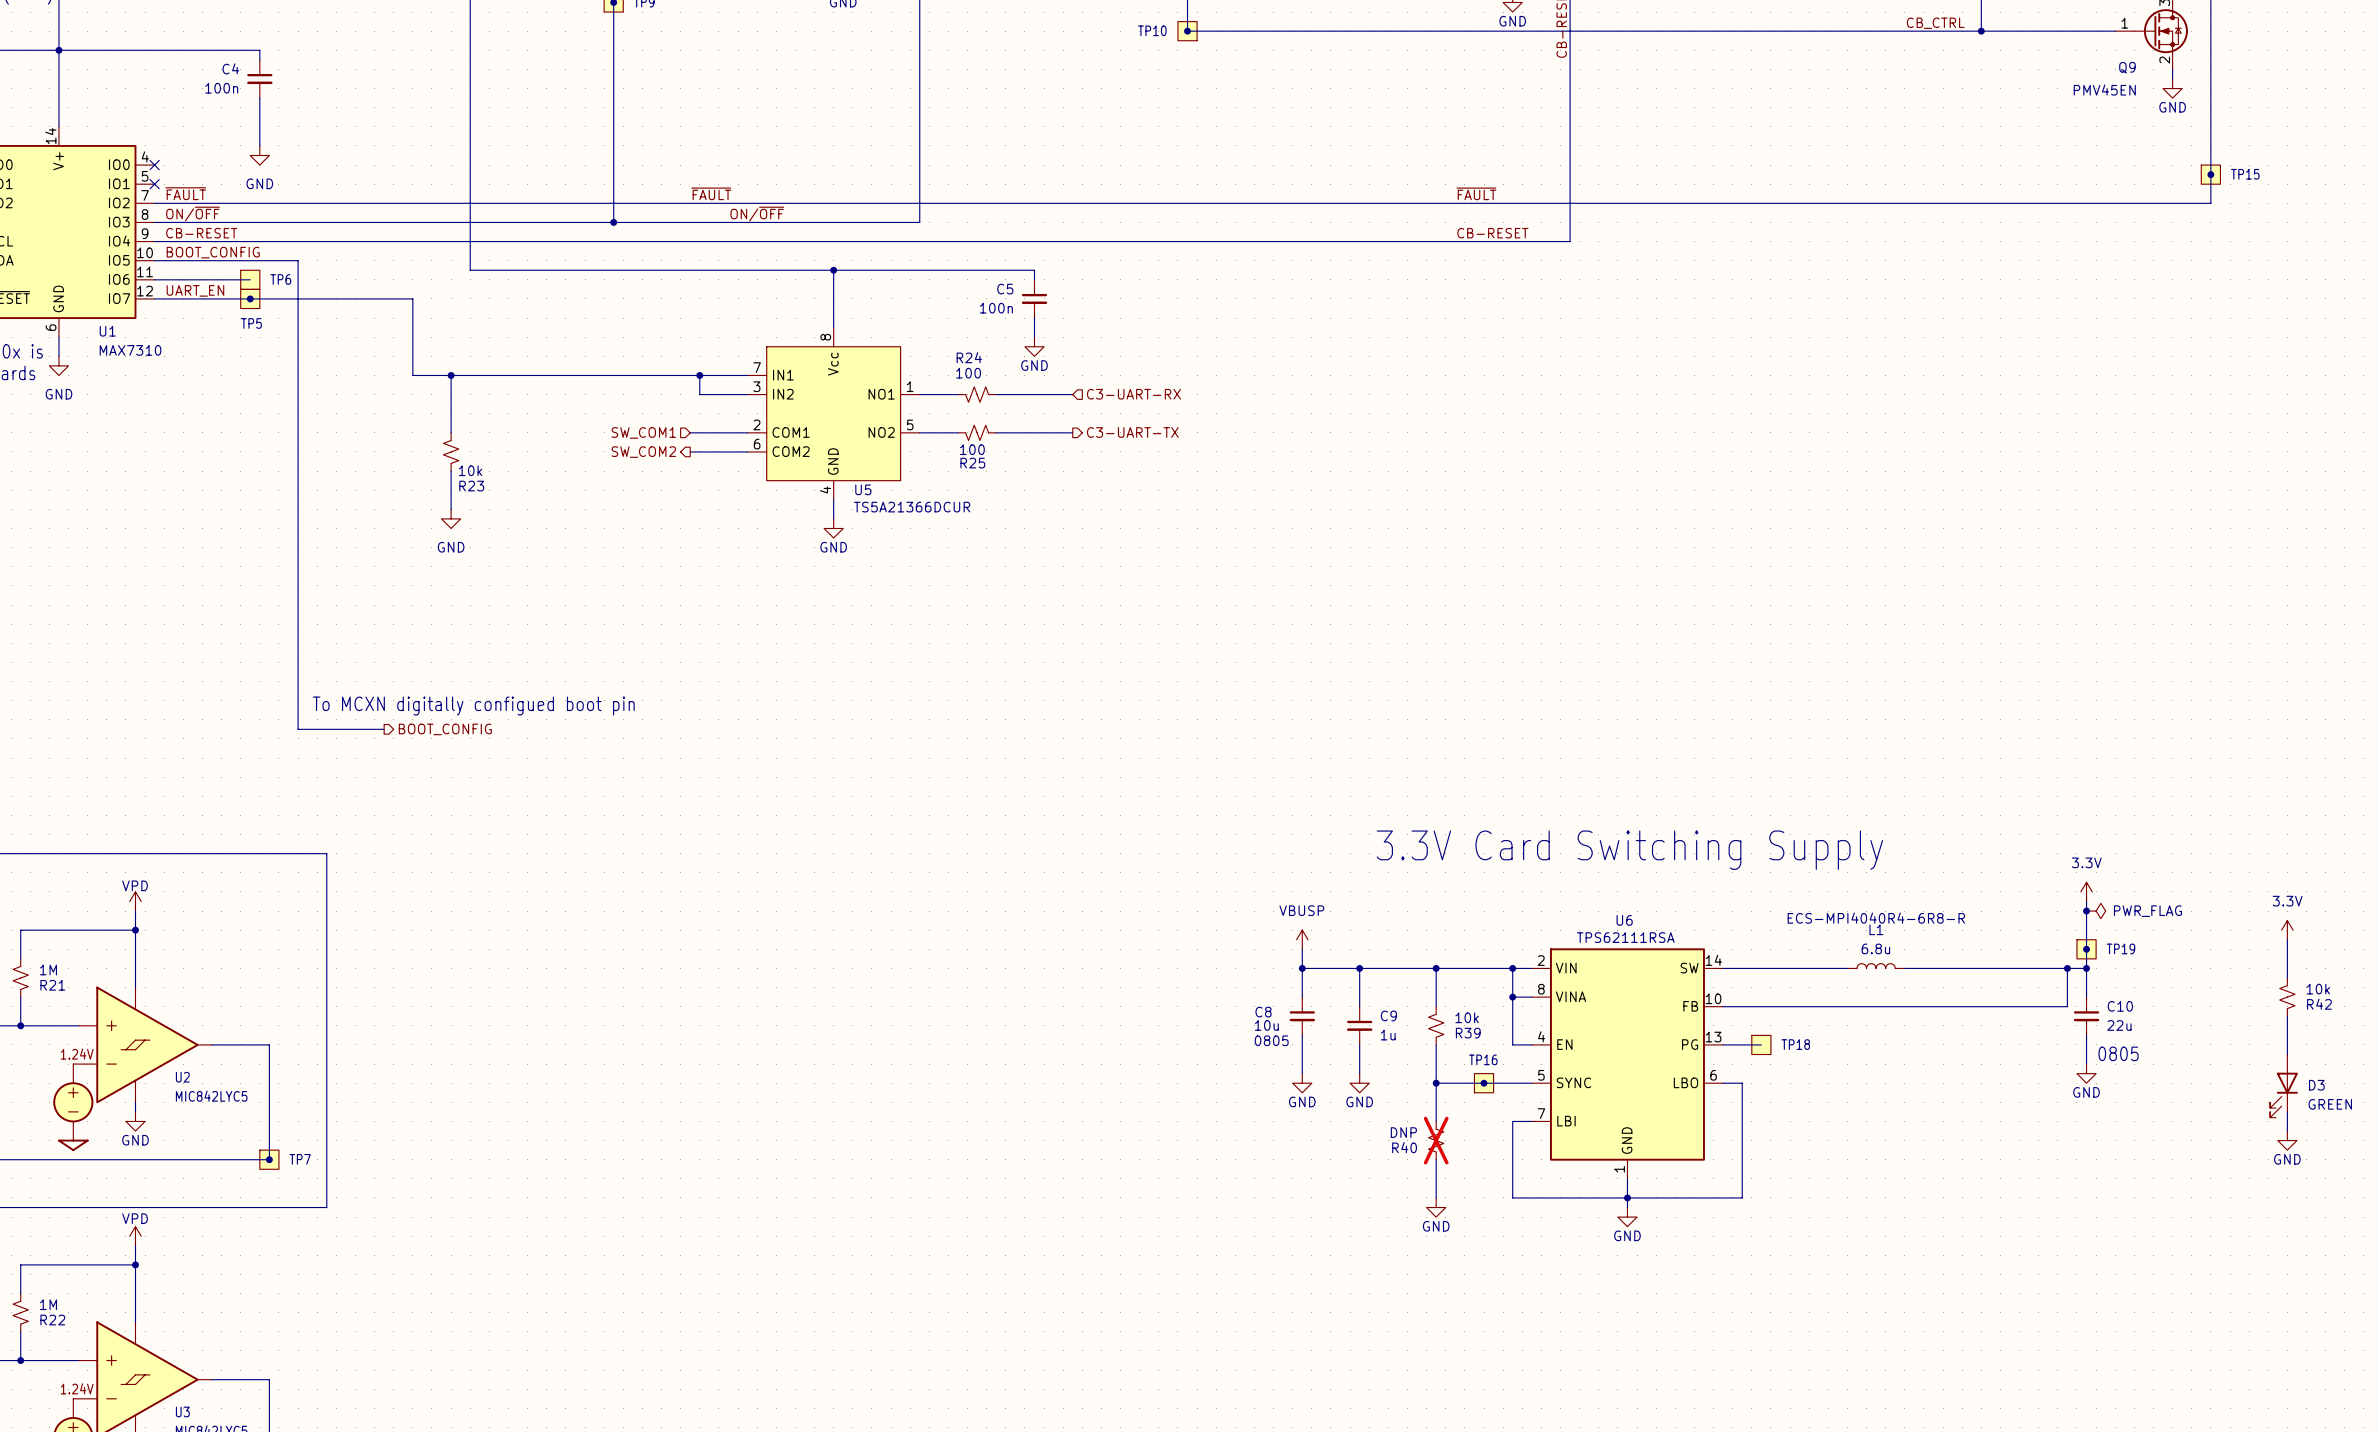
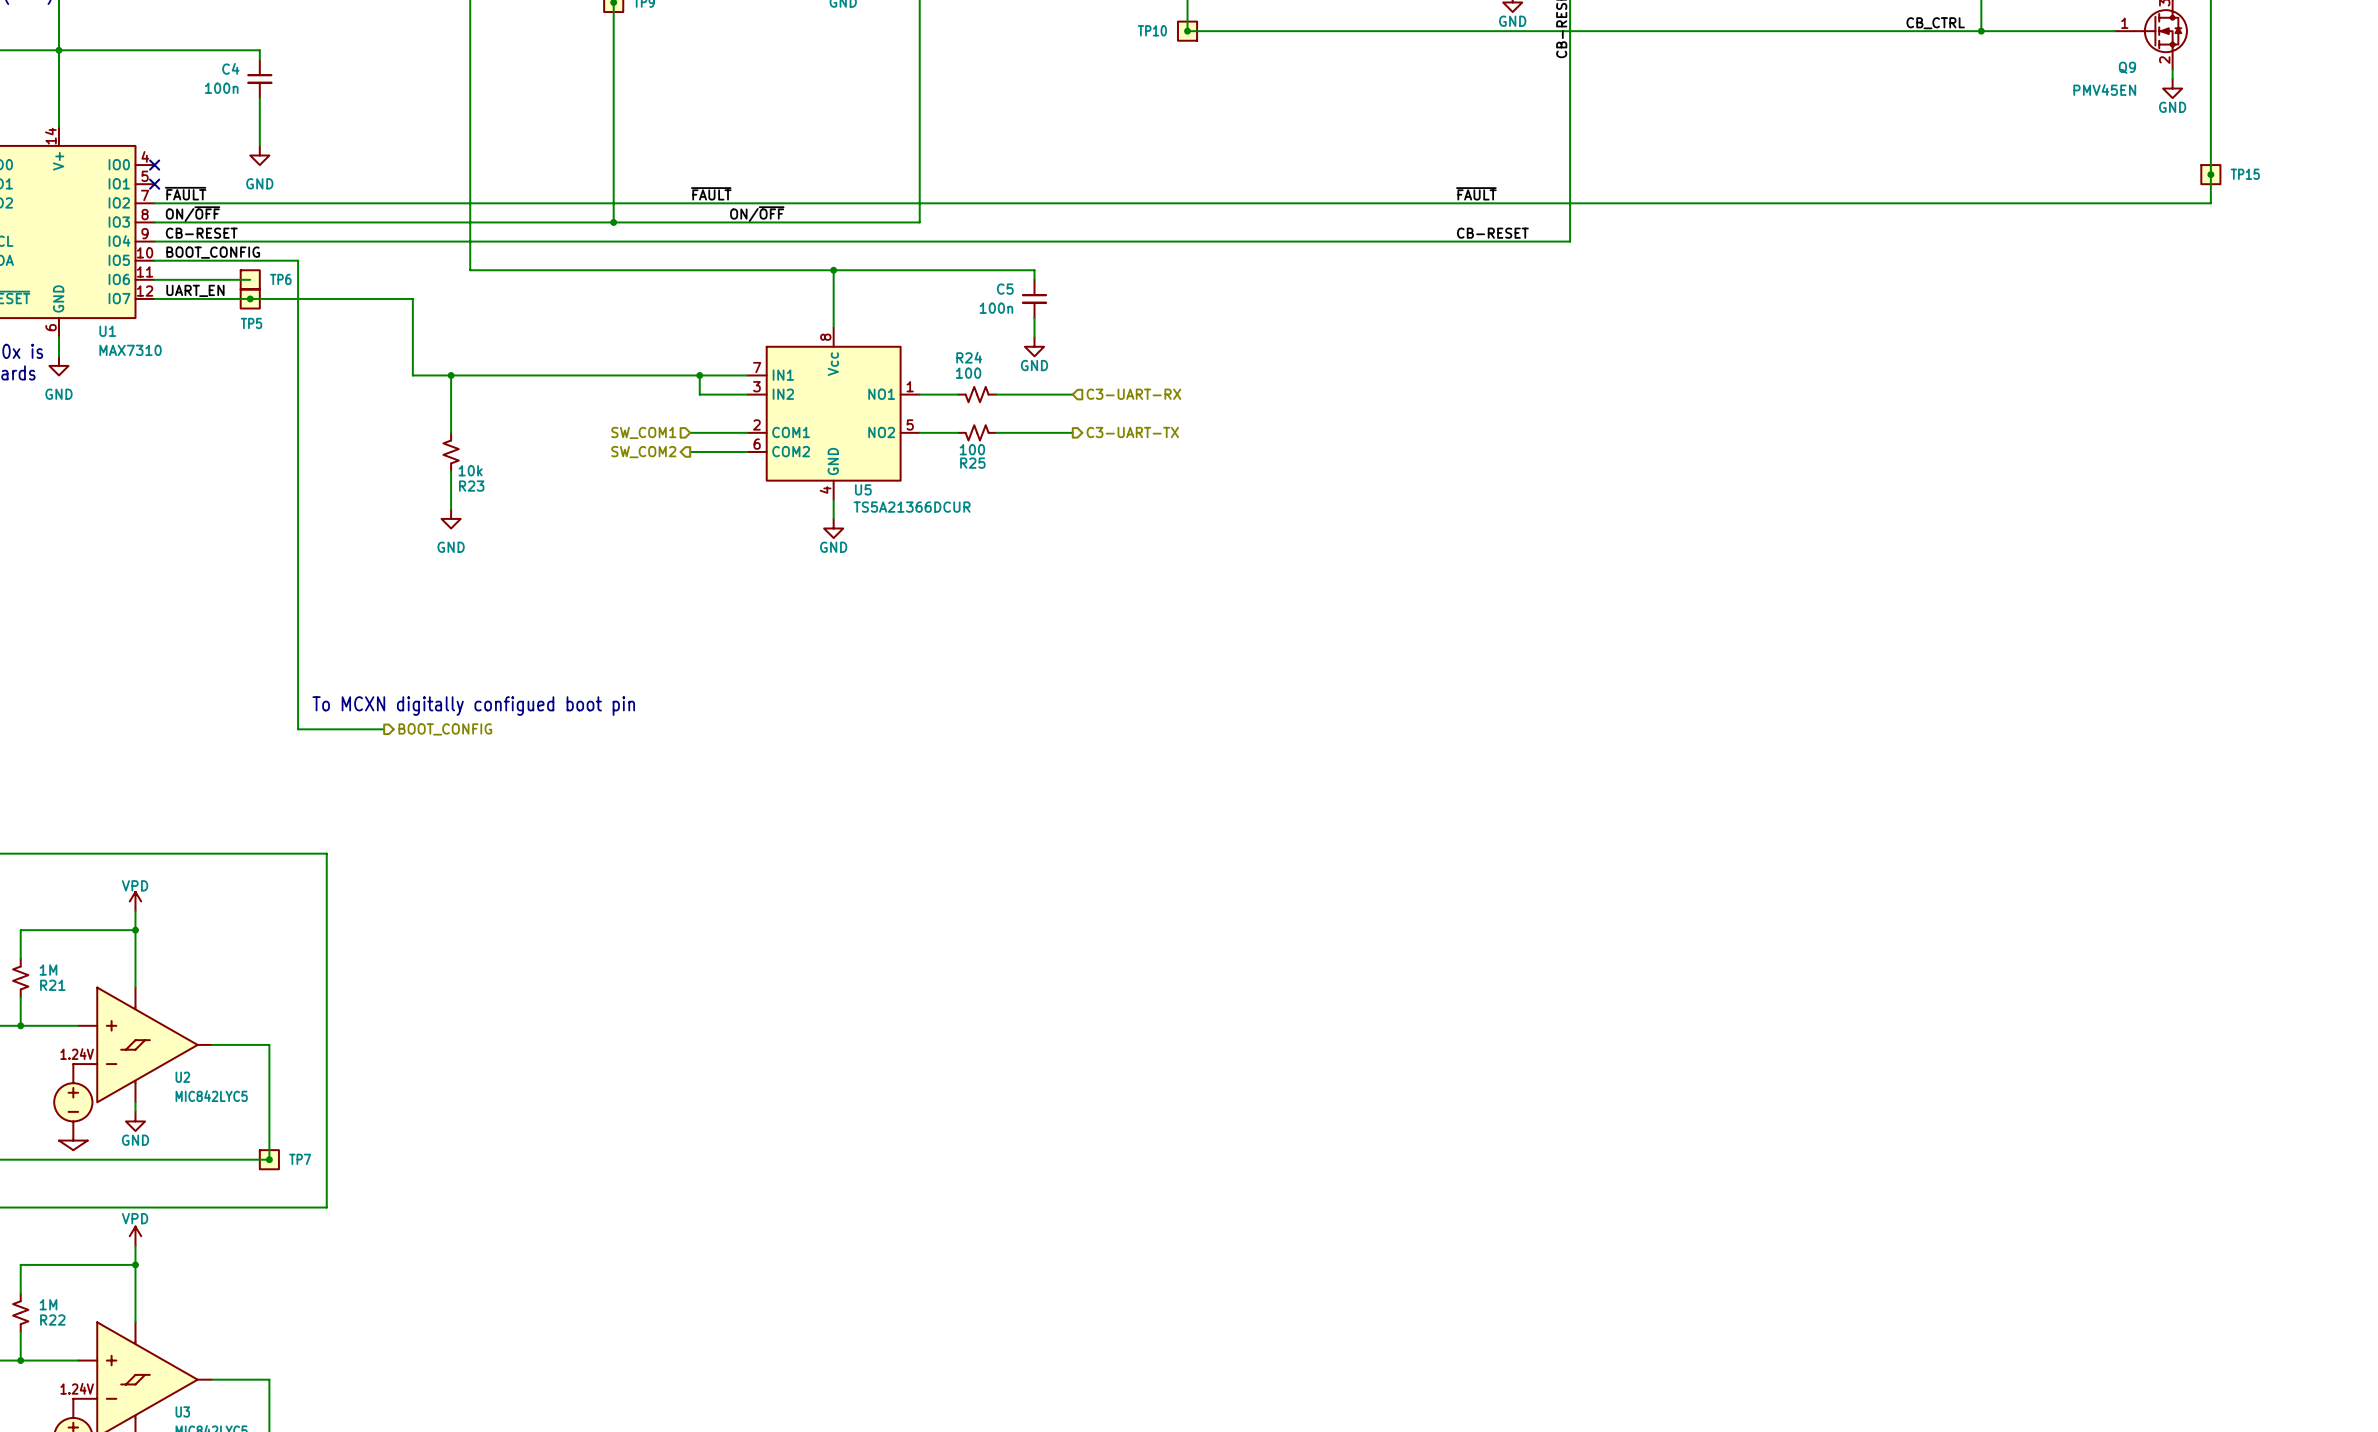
text: 3.3V Card Switching Supply (1629, 850) -> none
power symbol: 3.3V (2086, 891) -> none
wire: (2086, 901) (2086, 997) -> none
junction: (2086, 911) -> none
power symbol: PWR_FLAG (2096, 911) -> none
power symbol: 3.3V (2287, 930) -> none
power symbol: VBUSP (1302, 939) -> none
wire: (2287, 939) (2287, 977) -> none
wire: (1302, 949) (1302, 997) -> none
junction: (2086, 949) -> none
TP19: (2086, 949) -> none
L1: 6.8u (1876, 966) -> none
wire: (1302, 968) (1531, 968) -> none
junction: (1302, 968) -> none
wire: (1359, 968) (1359, 1006) -> none
junction: (1359, 968) -> none
wire: (1436, 968) (1436, 1006) -> none
junction: (1436, 968) -> none
wire: (1512, 968) (1512, 1044) (1531, 1044) -> none
junction: (1512, 968) -> none
wire: (1723, 968) (1847, 968) -> none
wire: (1904, 968) (2086, 968) -> none
wire: (2067, 968) (2067, 1006) (1723, 1006) -> none
junction: (2067, 968) -> none
junction: (2086, 968) -> none
wire: (1512, 997) (1531, 997) -> none
junction: (1512, 997) -> none
R42: 10k (2287, 997) -> none
C8: 10u (1302, 1016) -> none
C10: 22u (2086, 1016) -> none
wire: (2287, 1016) (2287, 1054) -> none
C9: 1u (1359, 1025) -> none
R39: 10k (1436, 1025) -> none
wire: (1302, 1035) (1302, 1073) -> none
wire: (2086, 1035) (2086, 1064) -> none
wire: (1359, 1044) (1359, 1073) -> none
wire: (1436, 1044) (1436, 1121) -> none
wire: (1723, 1044) (1761, 1044) -> none
TP18: (1761, 1044) -> none
text: 0805 (2118, 1053) -> none
U6: TPS62111RSA (1627, 1063) -> none
power symbol: GND (2086, 1073) -> none
power symbol: GND (1302, 1083) -> none
power symbol: GND (1359, 1083) -> none
wire: (1436, 1083) (1531, 1083) -> none
junction: (1436, 1083) -> none
junction: (1484, 1083) -> none
TP16: (1484, 1083) -> none
wire: (1723, 1083) (1742, 1083) (1742, 1197) (1512, 1197) (1512, 1121) (1531, 1121) -> none
D3: GREEN (2284, 1086) -> none
wire: (2287, 1111) (2287, 1131) -> none
R40: DNP (1436, 1140) -> none
power symbol: GND (2287, 1140) -> none
wire: (1436, 1159) (1436, 1197) -> none
wire: (1627, 1178) (1627, 1207) -> none
junction: (1627, 1197) -> none
power symbol: GND (1436, 1207) -> none
power symbol: GND (1627, 1217) -> none

